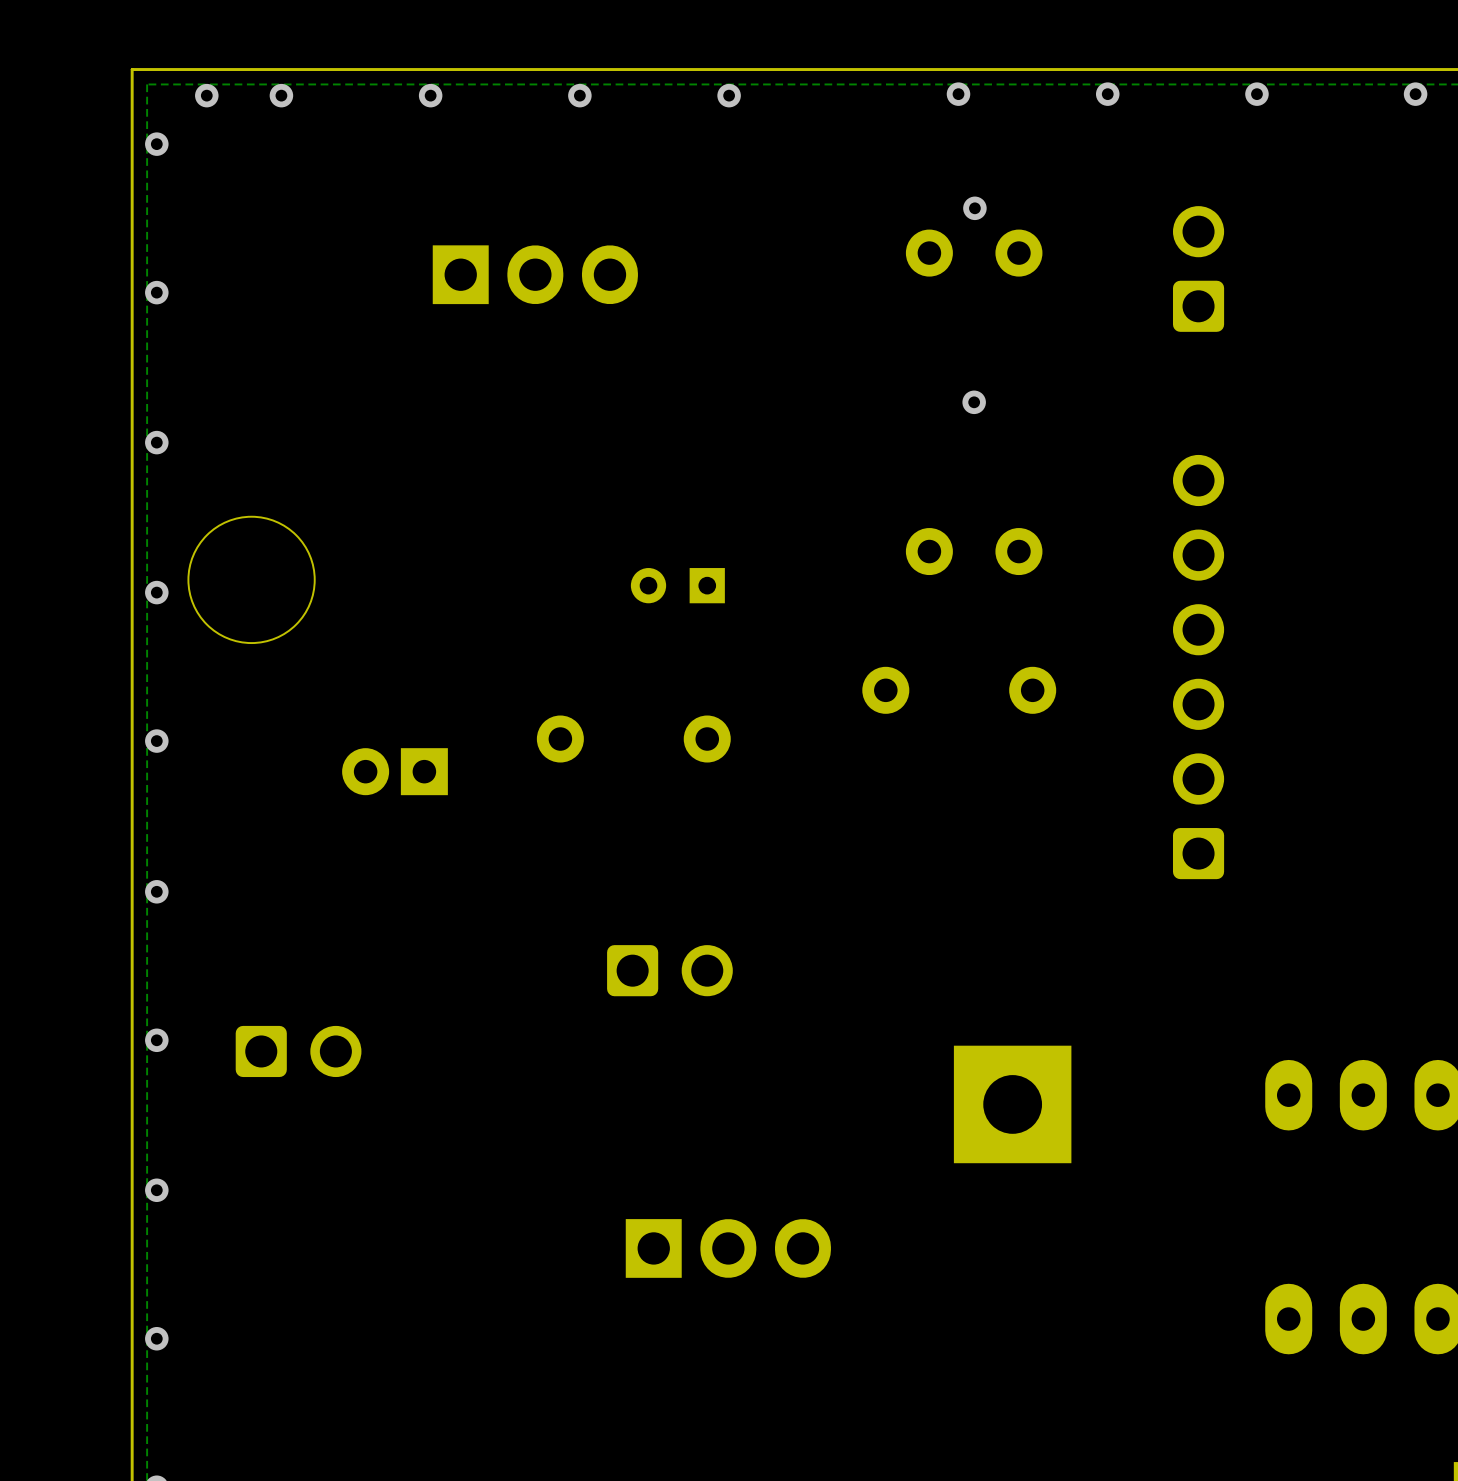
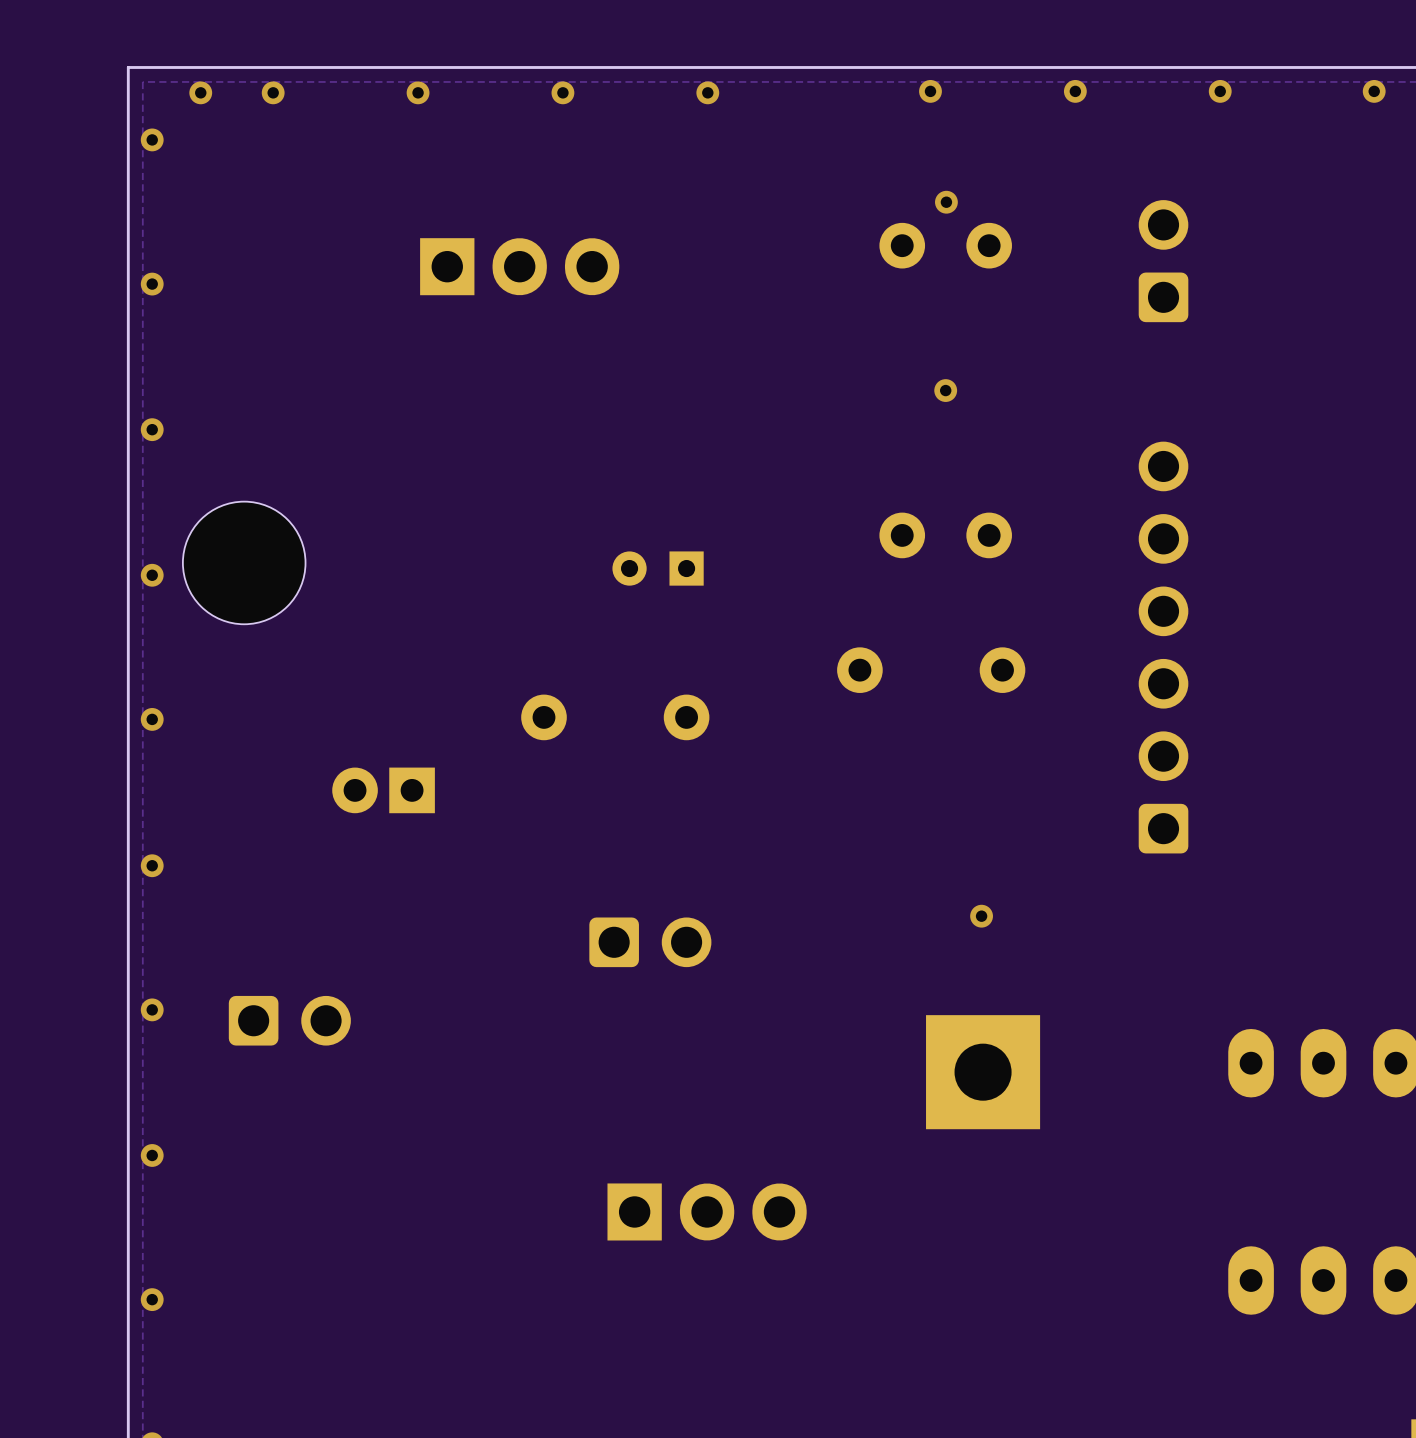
part position: (395, 771) -> (383, 790)
via: none -> (981, 916)

